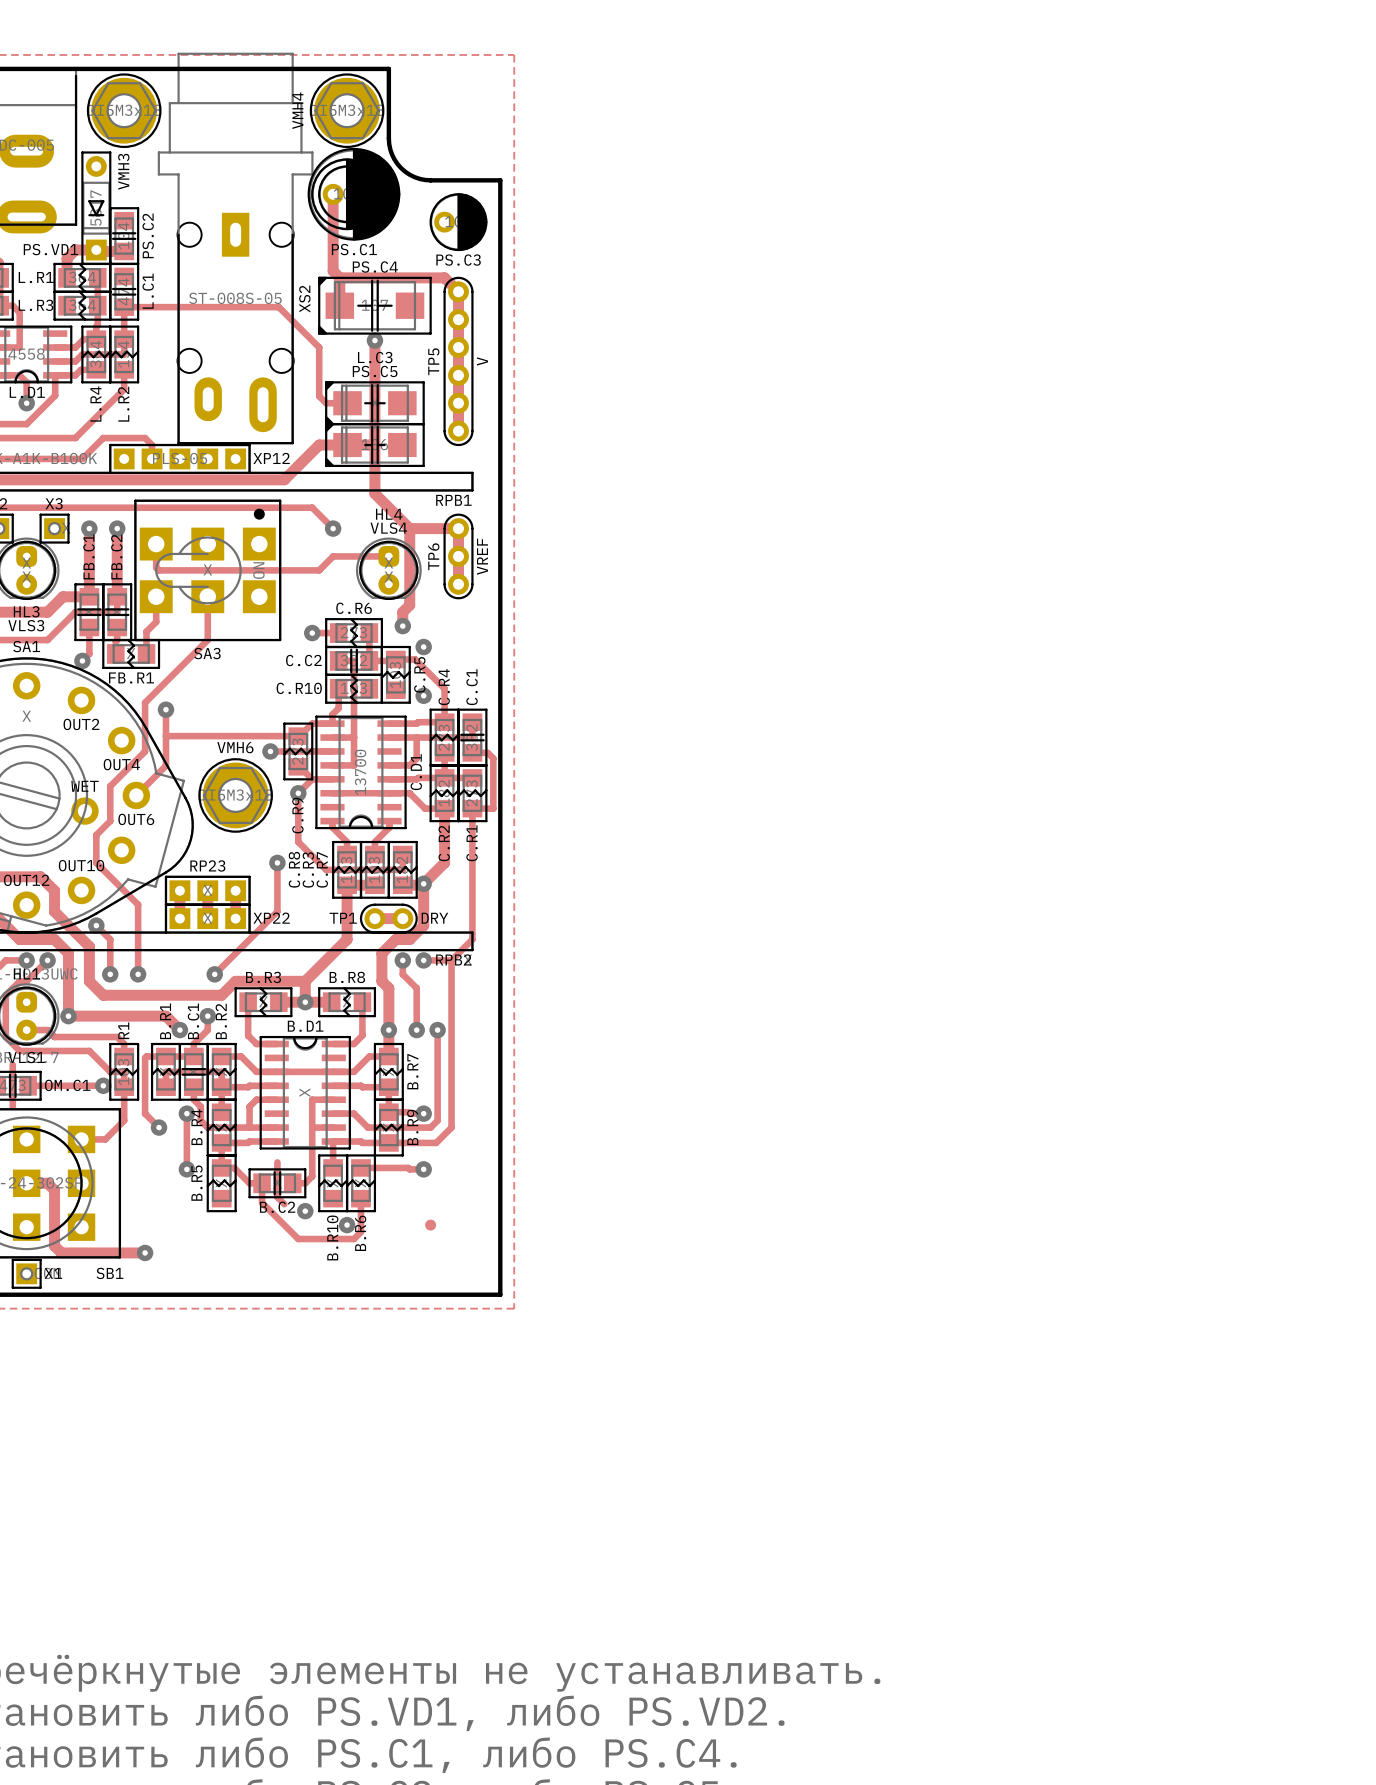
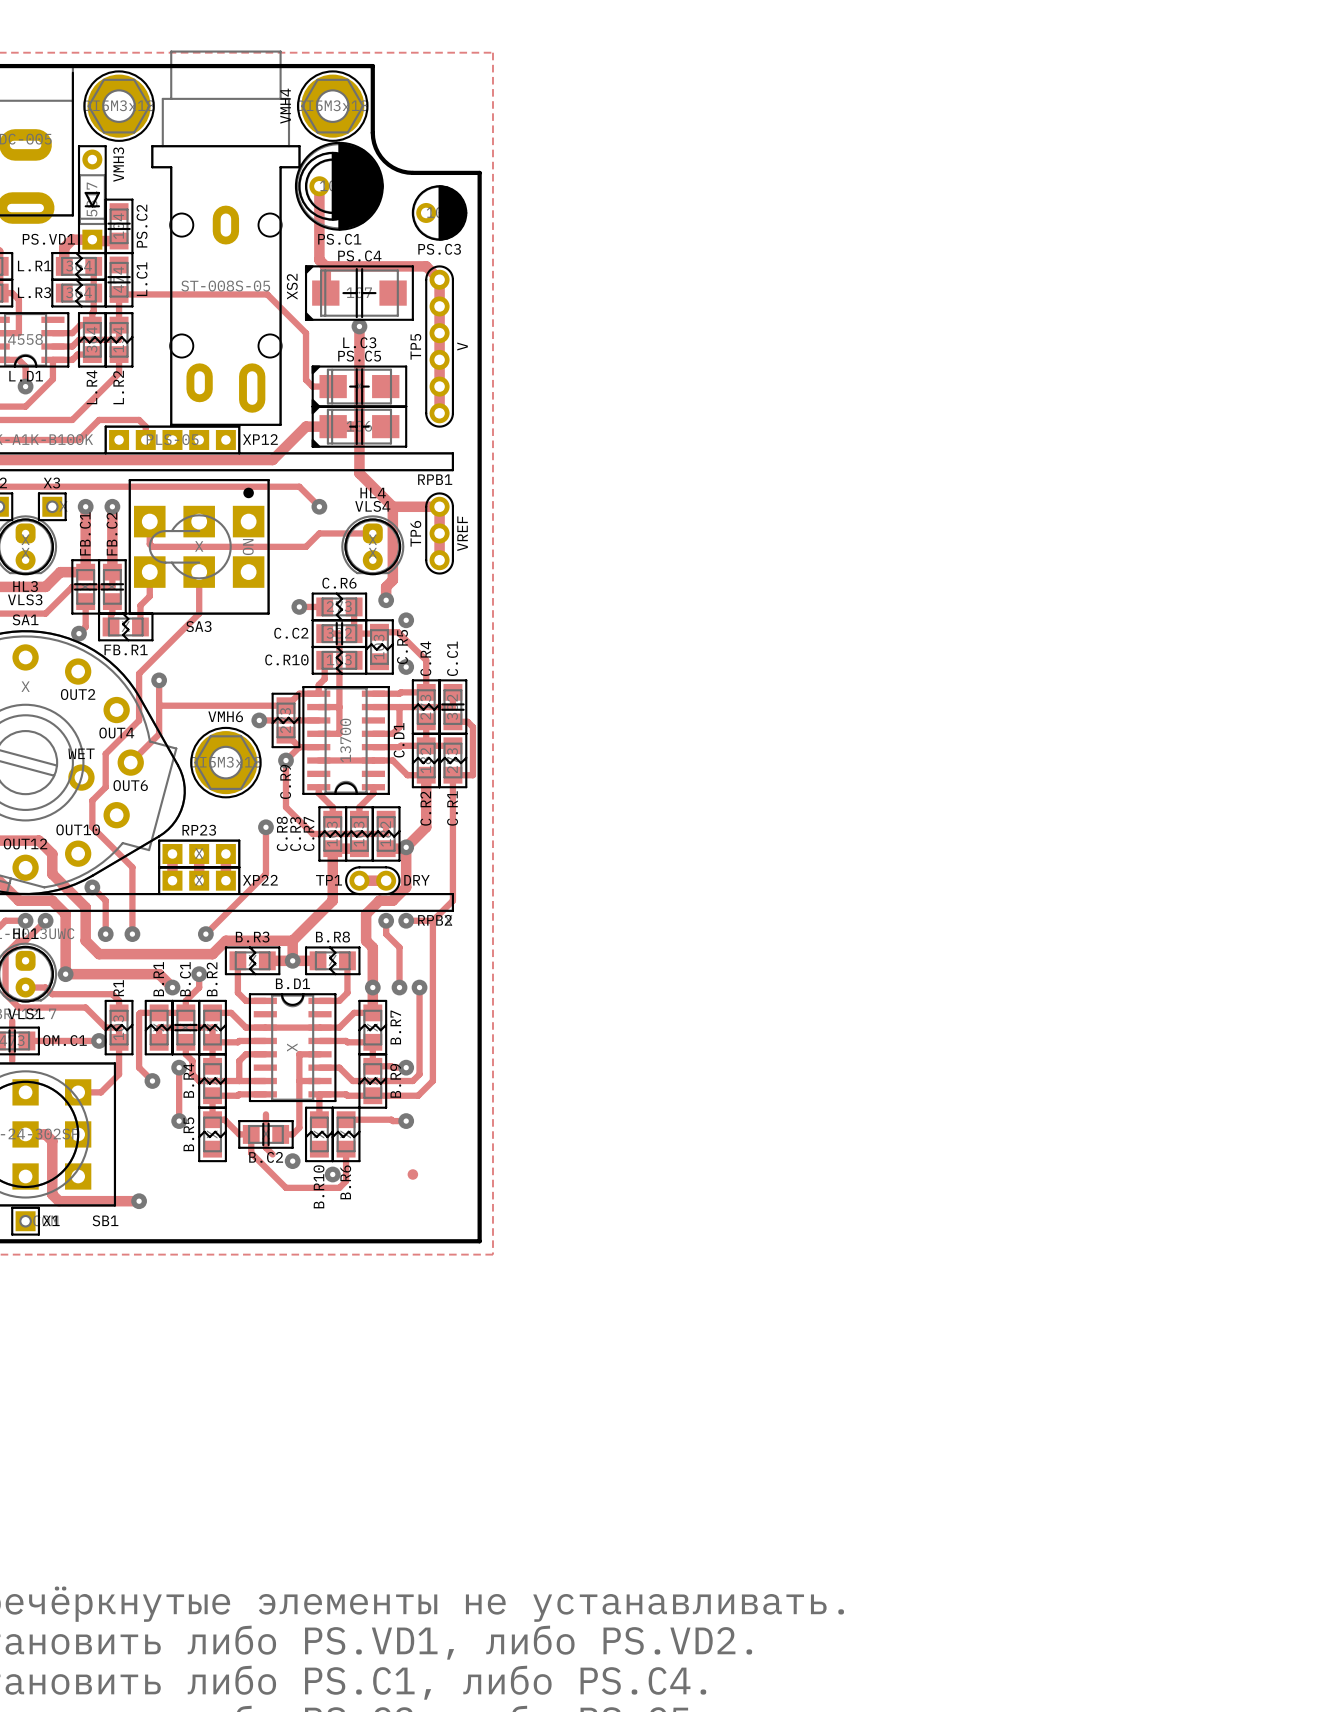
XS2 footprint: [157, 52, 314, 445] -> [151, 50, 301, 426]

